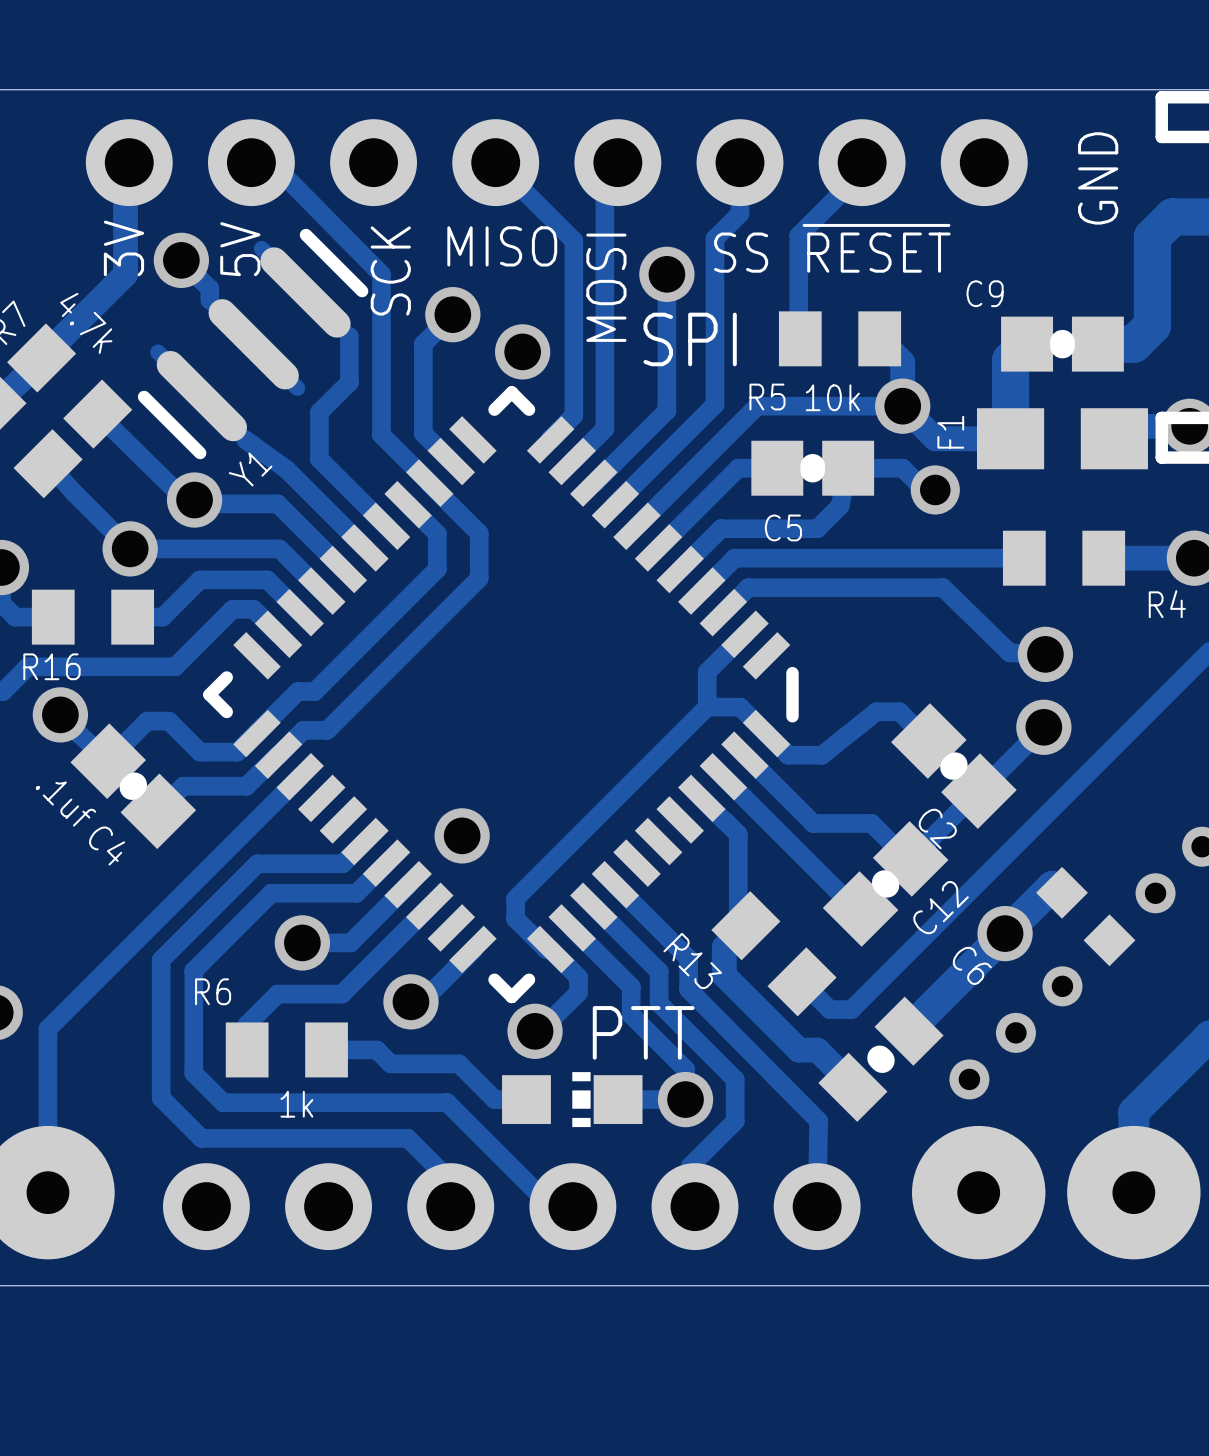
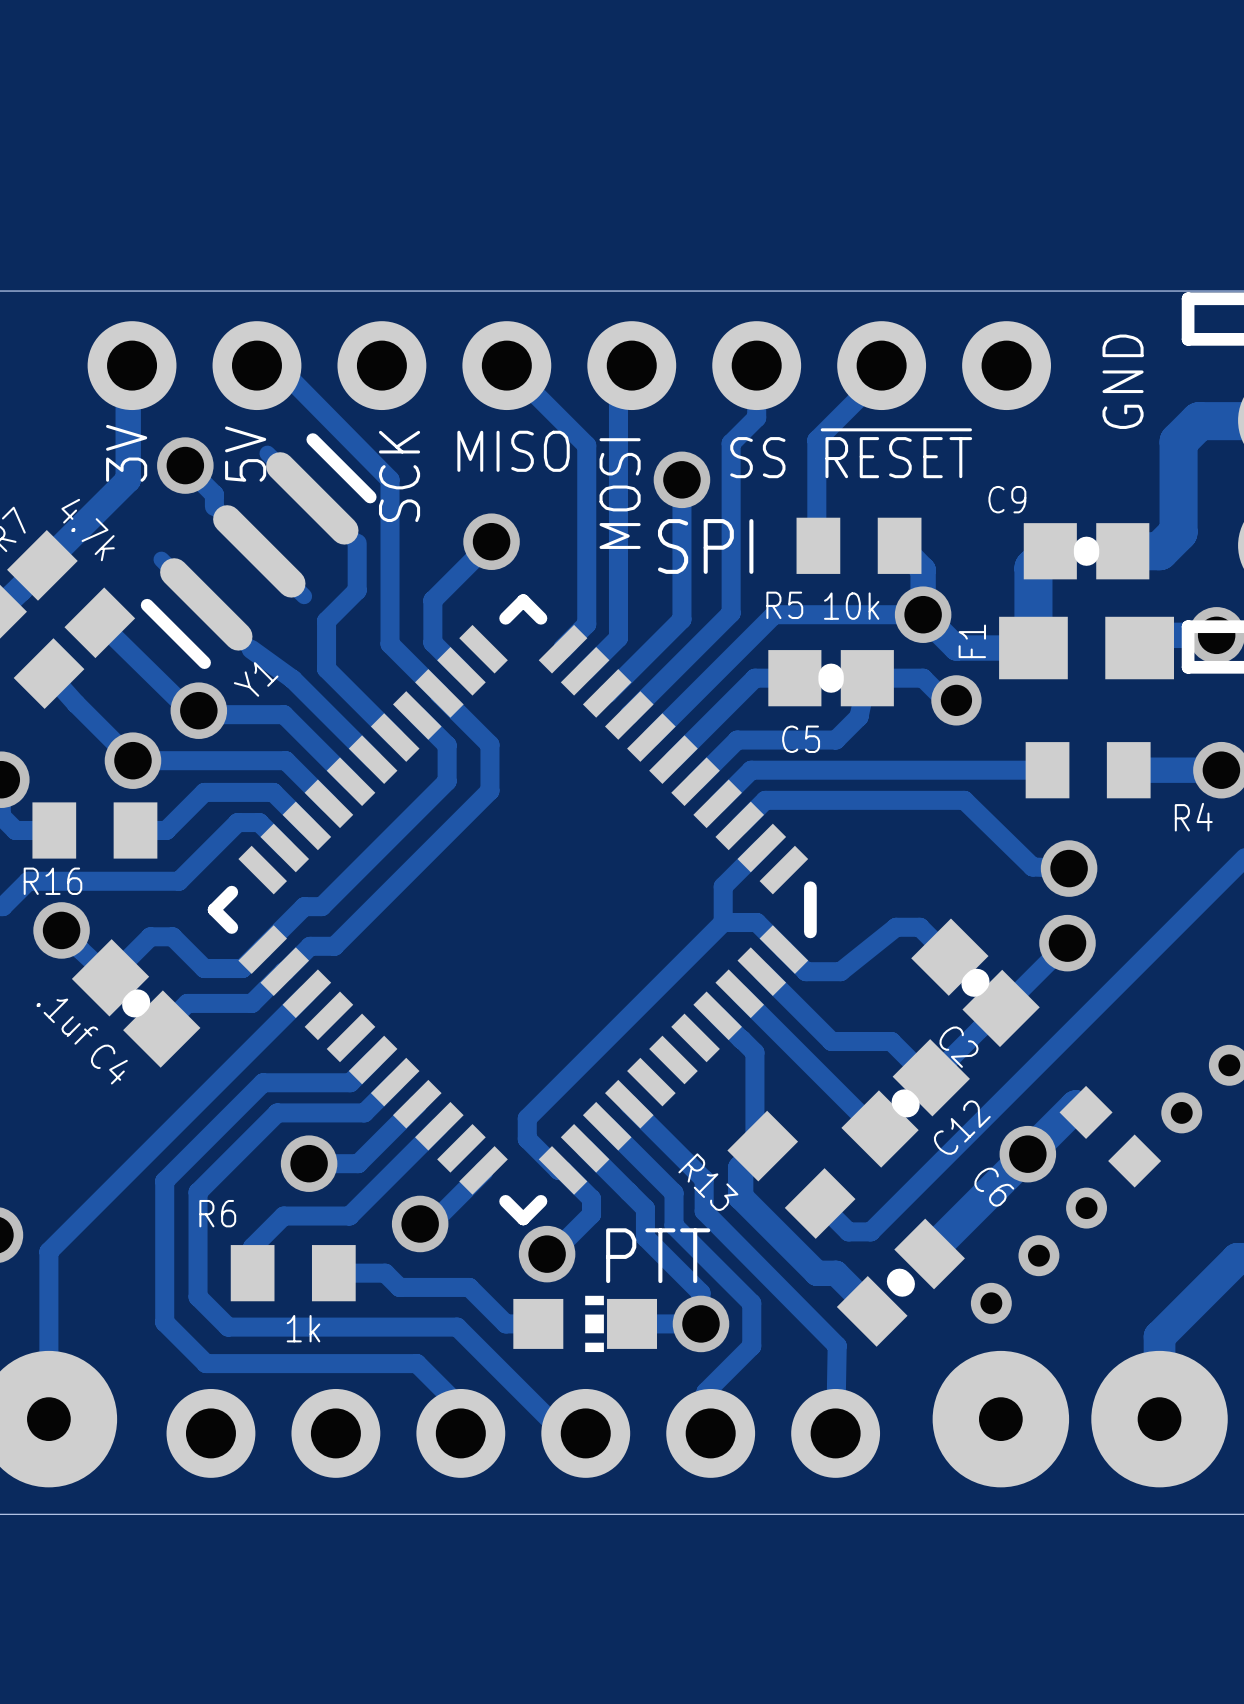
track: (452, 314) (423, 344) (423, 392) -> (491, 541) (432, 600)
via: (452, 314) -> none
via: none -> (491, 541)
via: (522, 351) -> none
via: (462, 835) -> none

